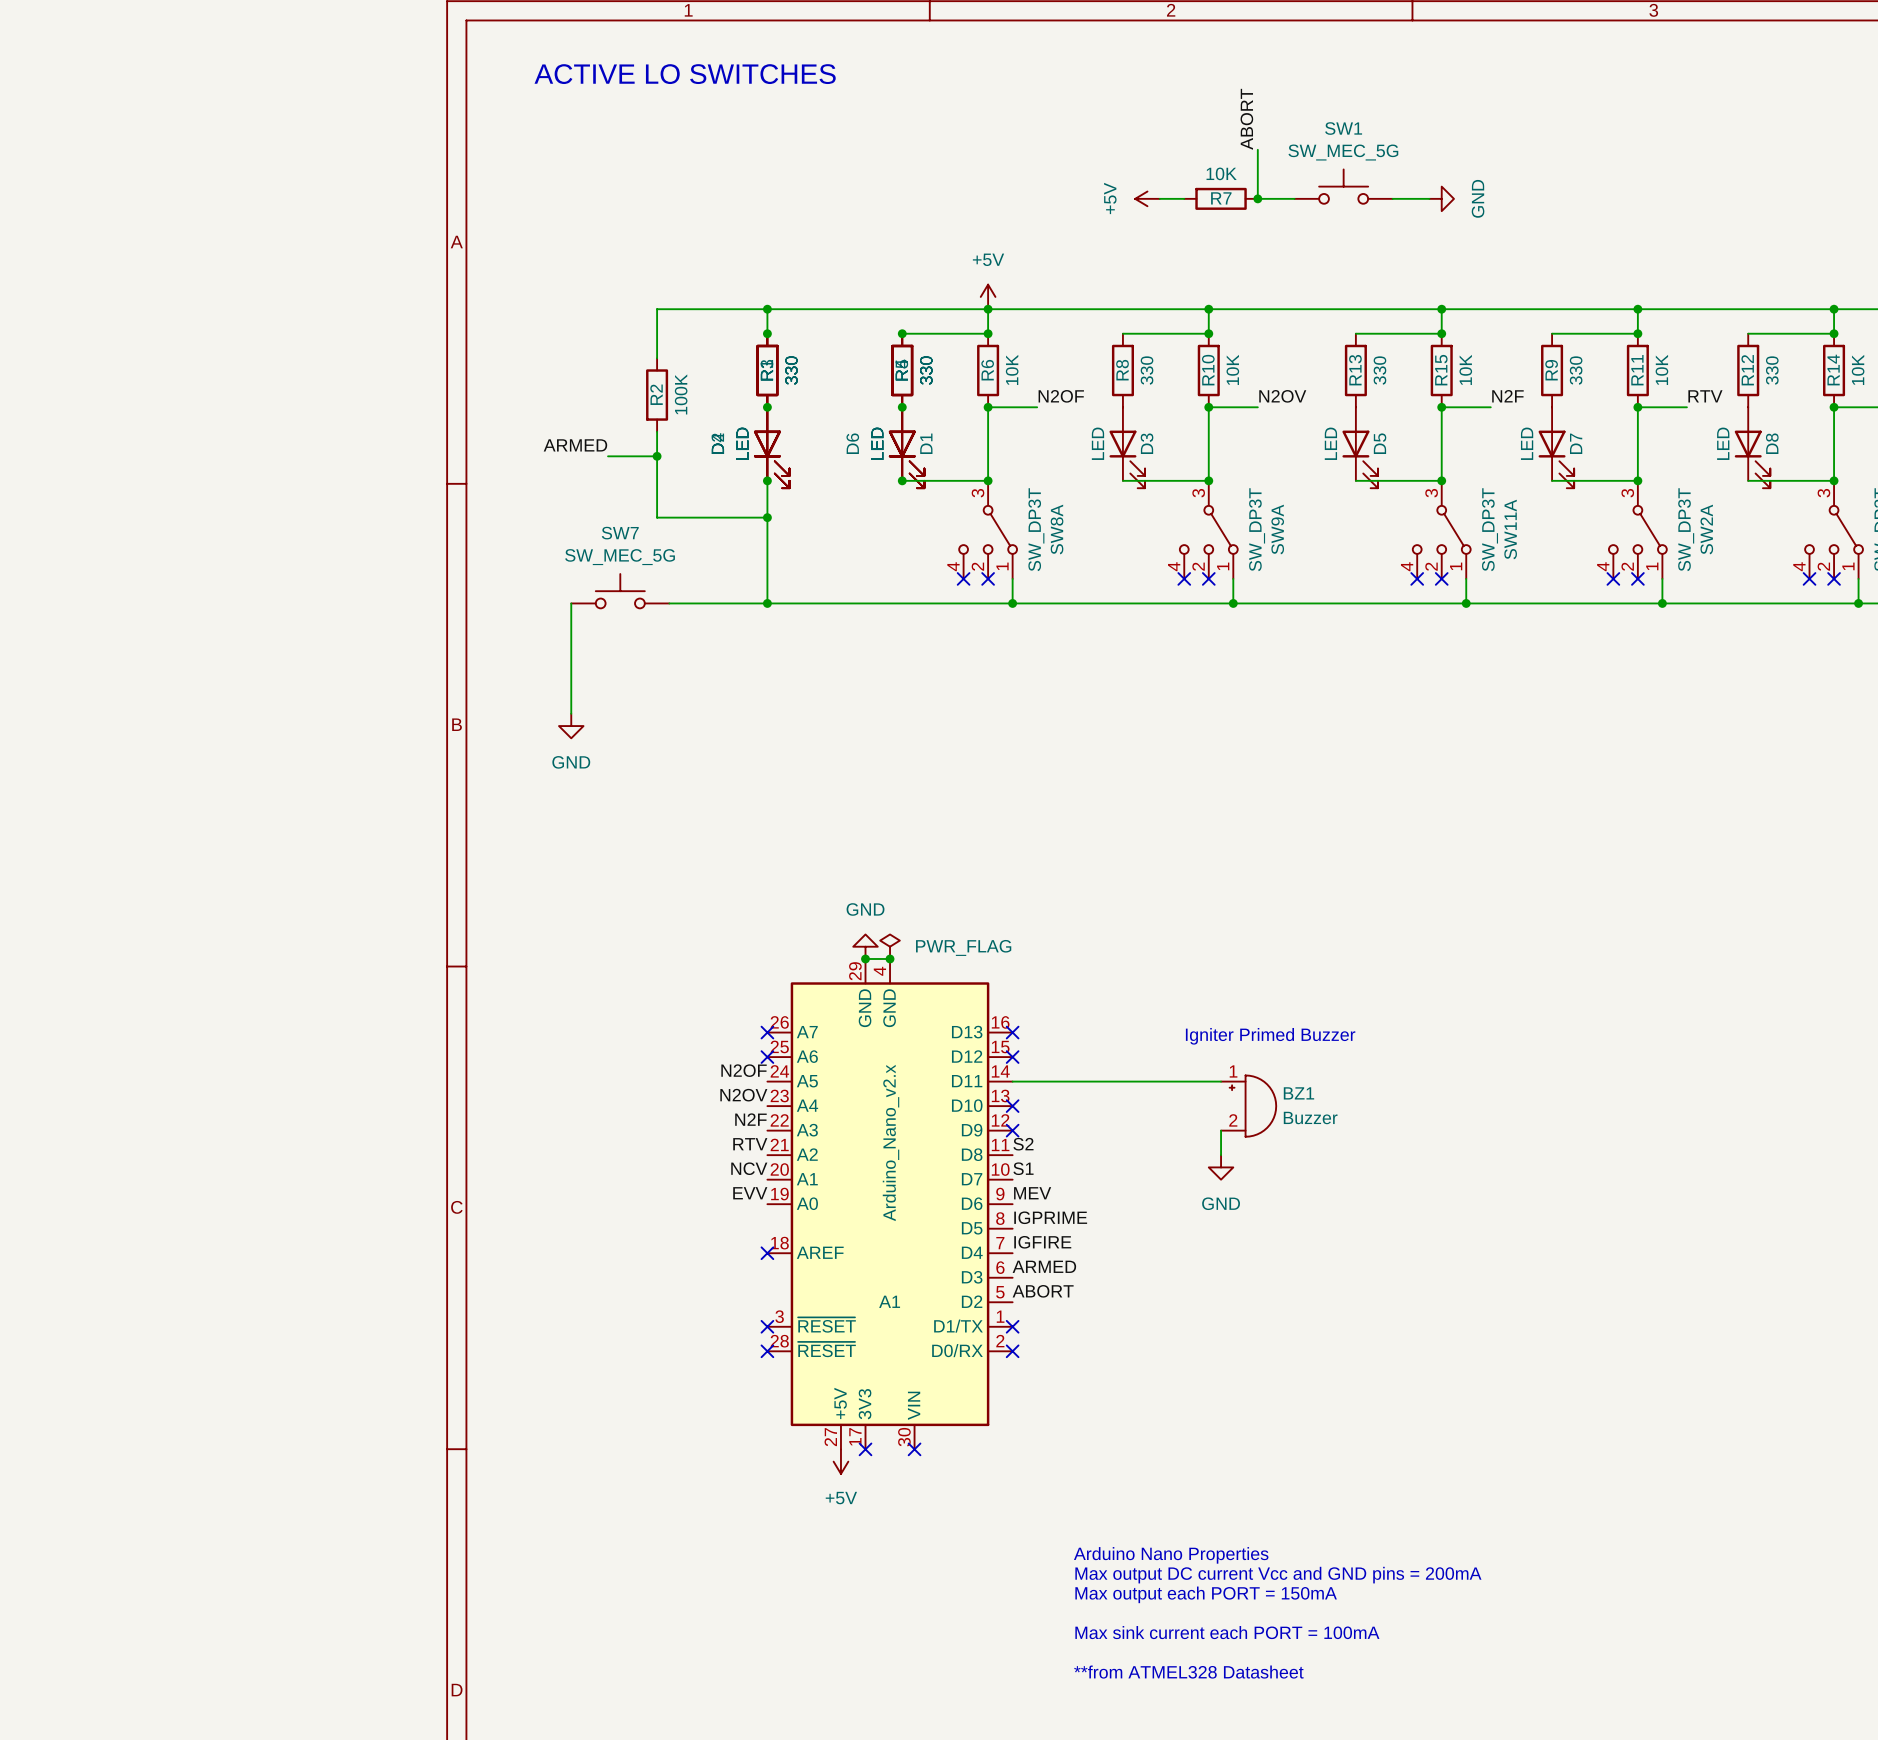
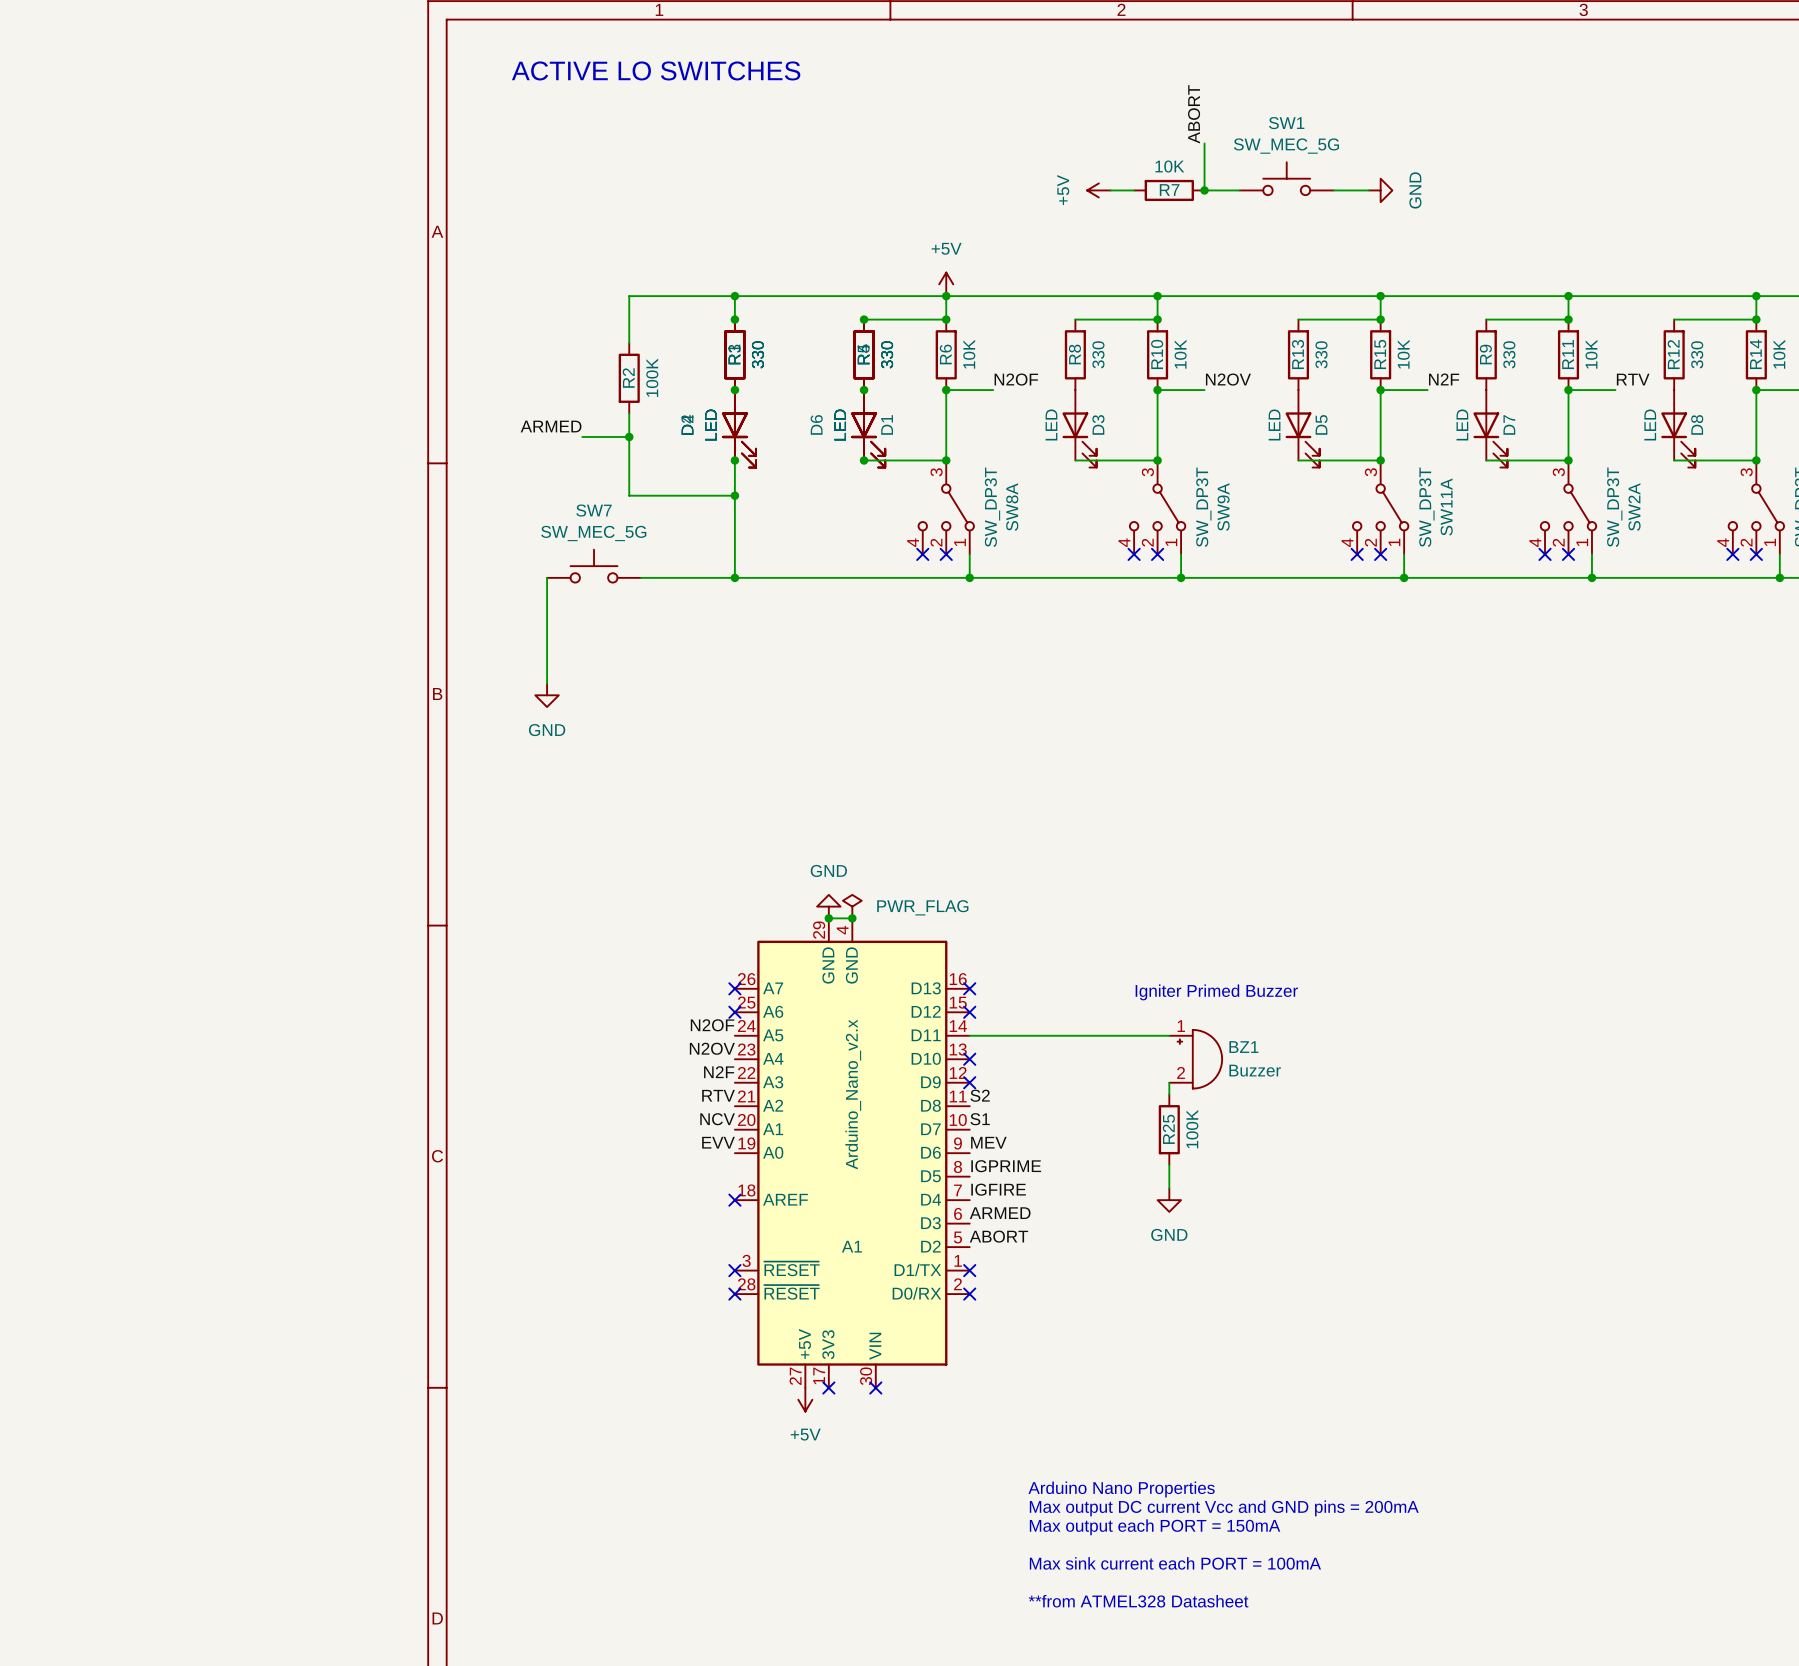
power symbol position: GND (1221, 1167) -> GND (1169, 1200)
R25: none -> 100K (1169, 1129)
wire: none -> (1169, 1164) (1169, 1188)

